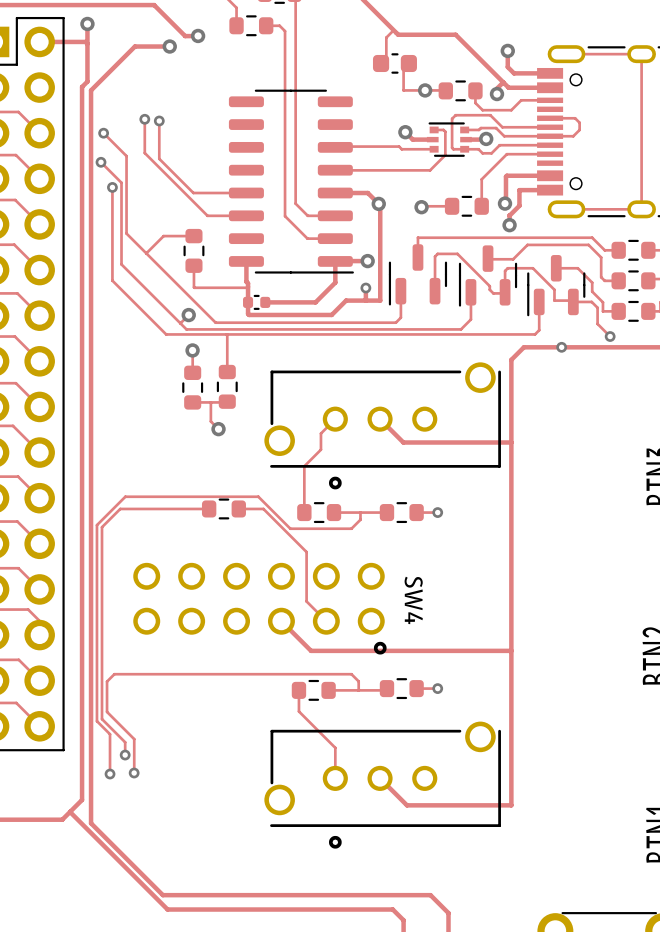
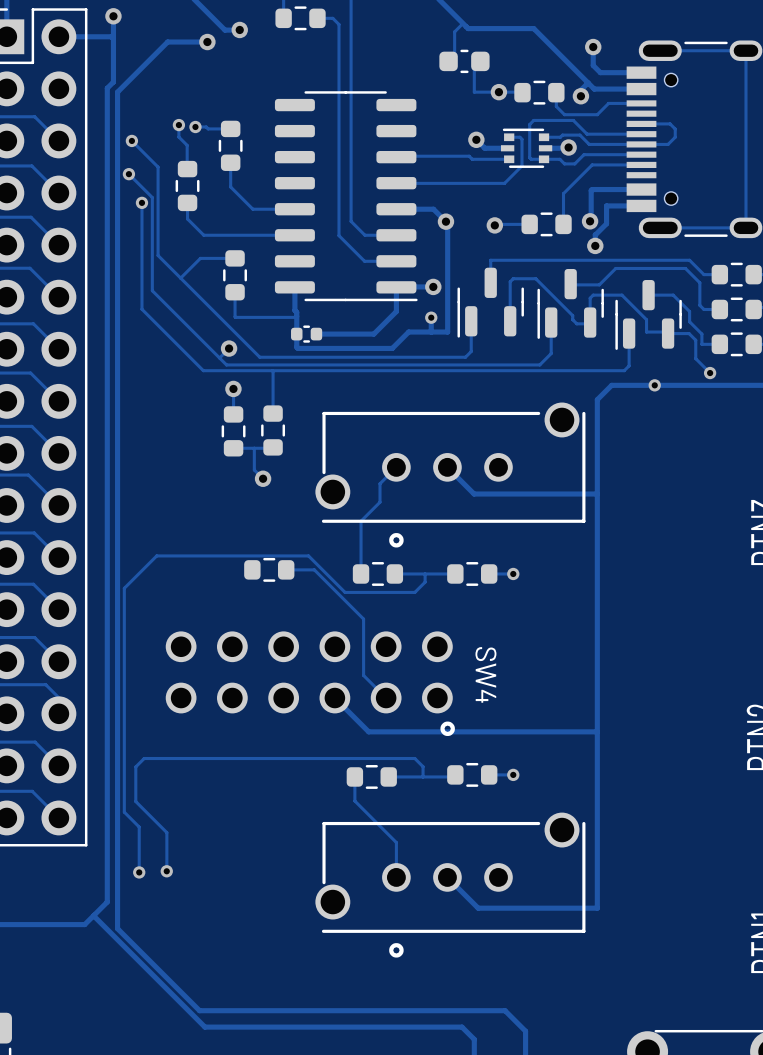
track: (159, 120) (159, 158) (193, 193) (209, 193) -> (230, 162) (230, 187) (252, 209)
track: none -> (195, 127) (230, 128)
track: (144, 129) (144, 153) (207, 215) -> (187, 202) (187, 218) (203, 235) (250, 235)
track: none -> (178, 137) (187, 145) (187, 169)
part: none -> (230, 145)
part: none -> (187, 185)
track: (209, 508) (120, 508) (102, 527) (102, 719) (125, 742) (125, 755) -> none
via: (125, 755) -> none

